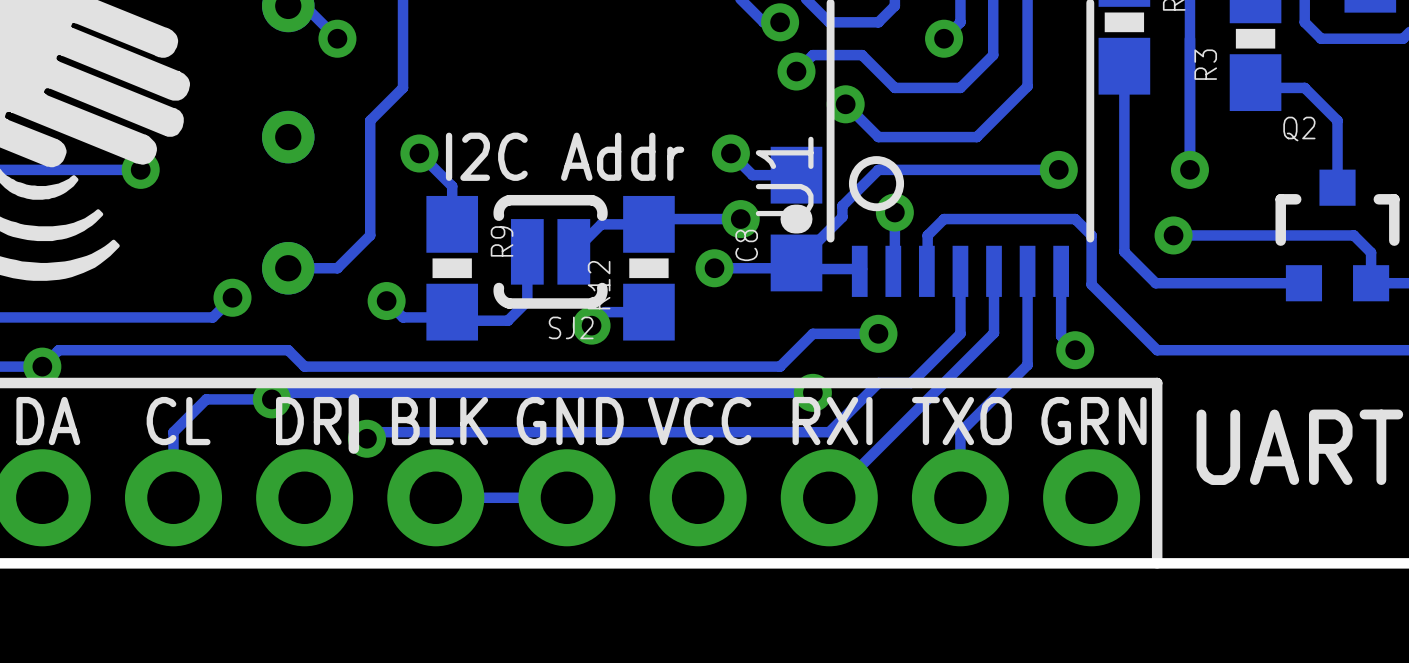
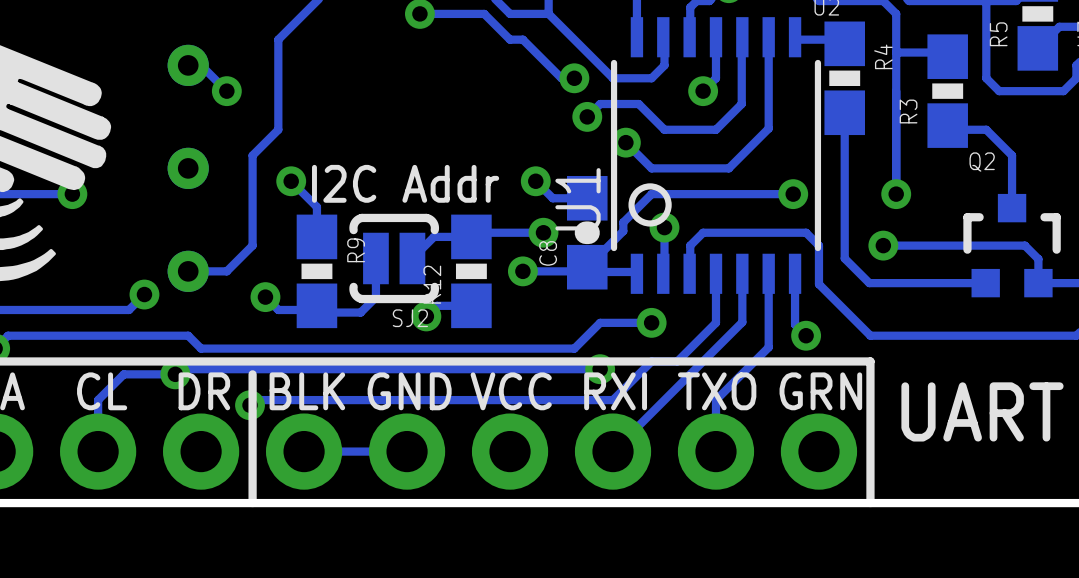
line: (353, 399) (353, 448) -> none
line: none -> (252, 374) (252, 503)

